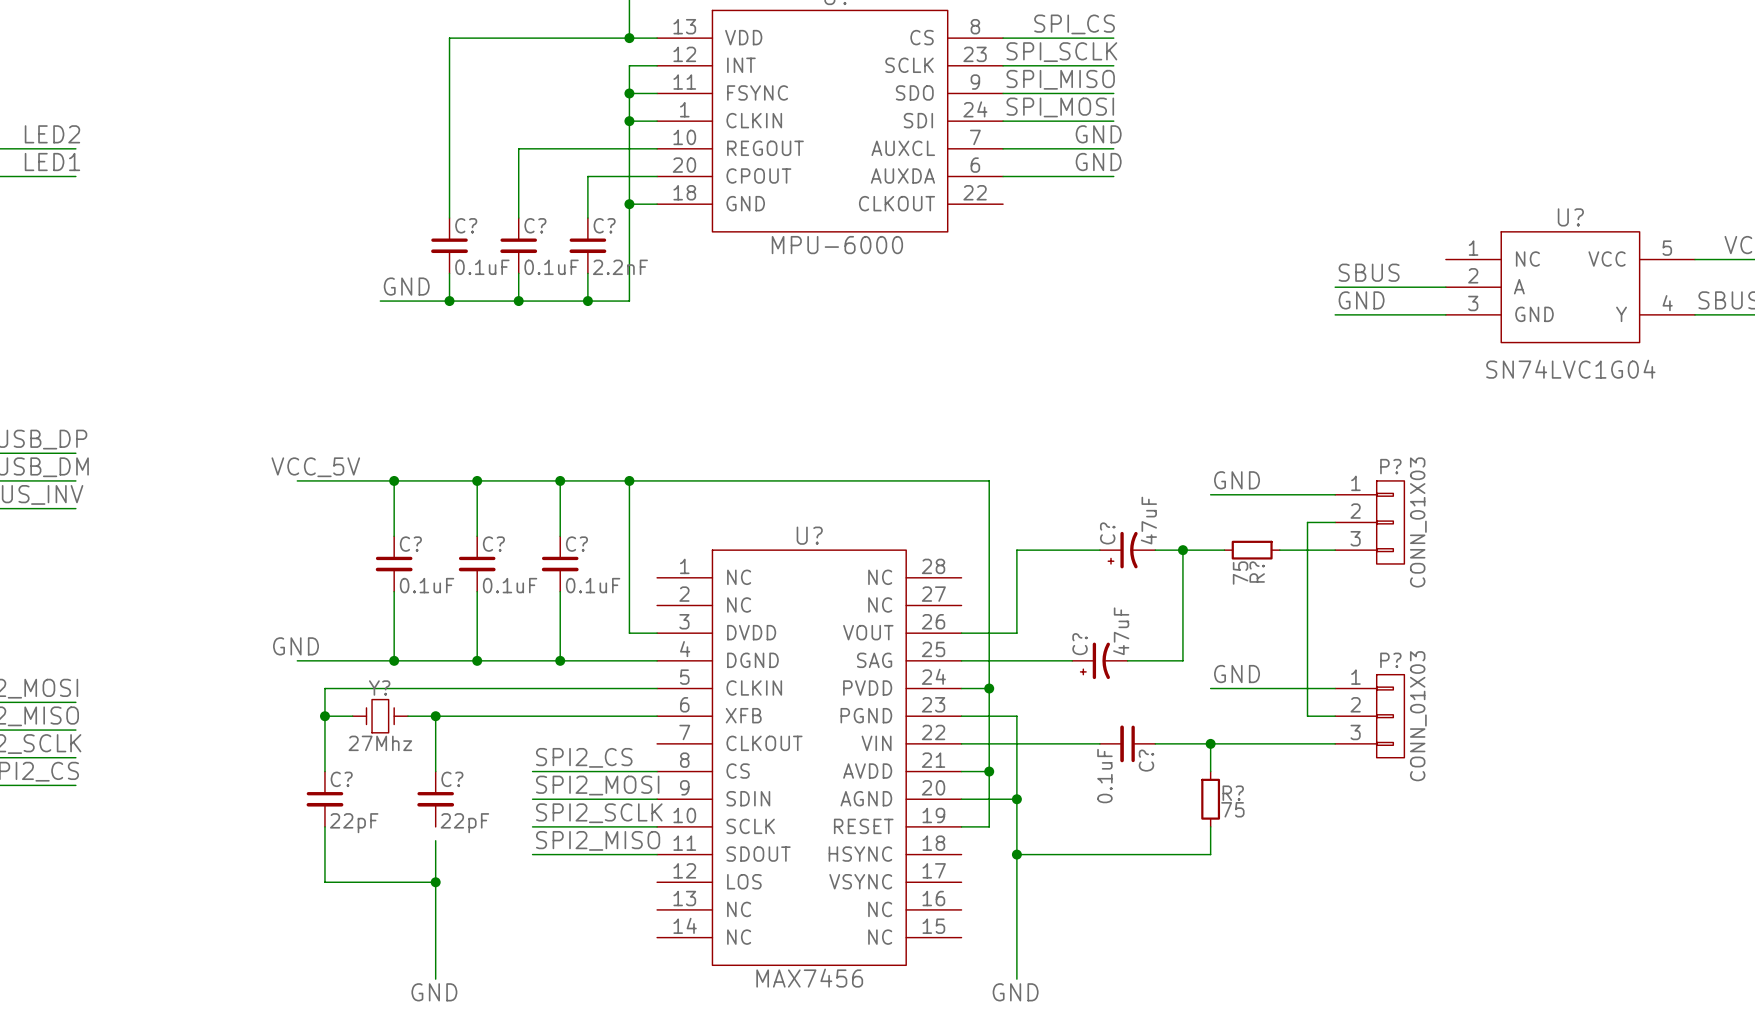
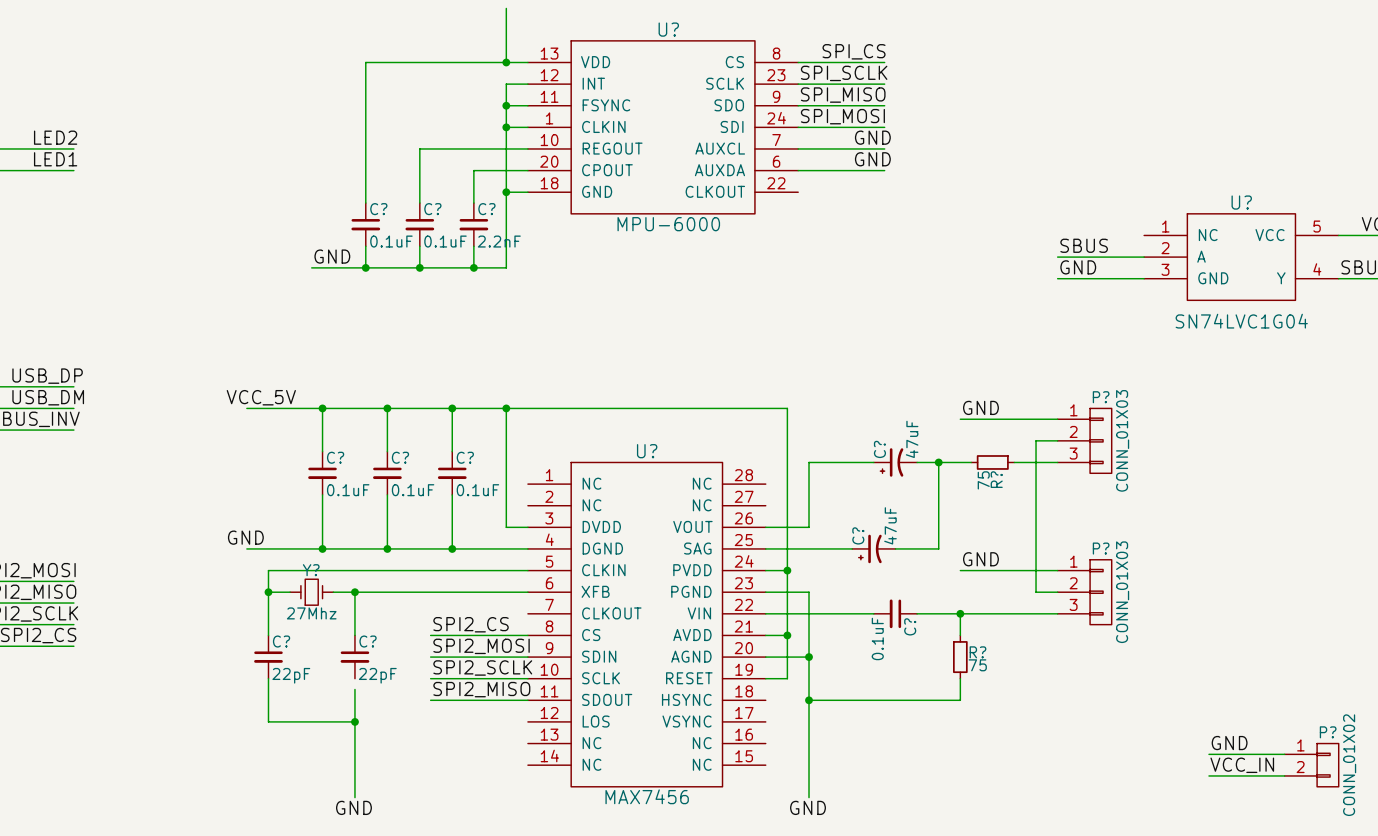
label: none -> GND (1229, 743)
wire: none -> (1208, 754) (1284, 754)
label: none -> VCC_IN (1242, 765)
P?: none -> CONN_01X02 (1311, 765)
wire: none -> (1208, 775) (1284, 775)

